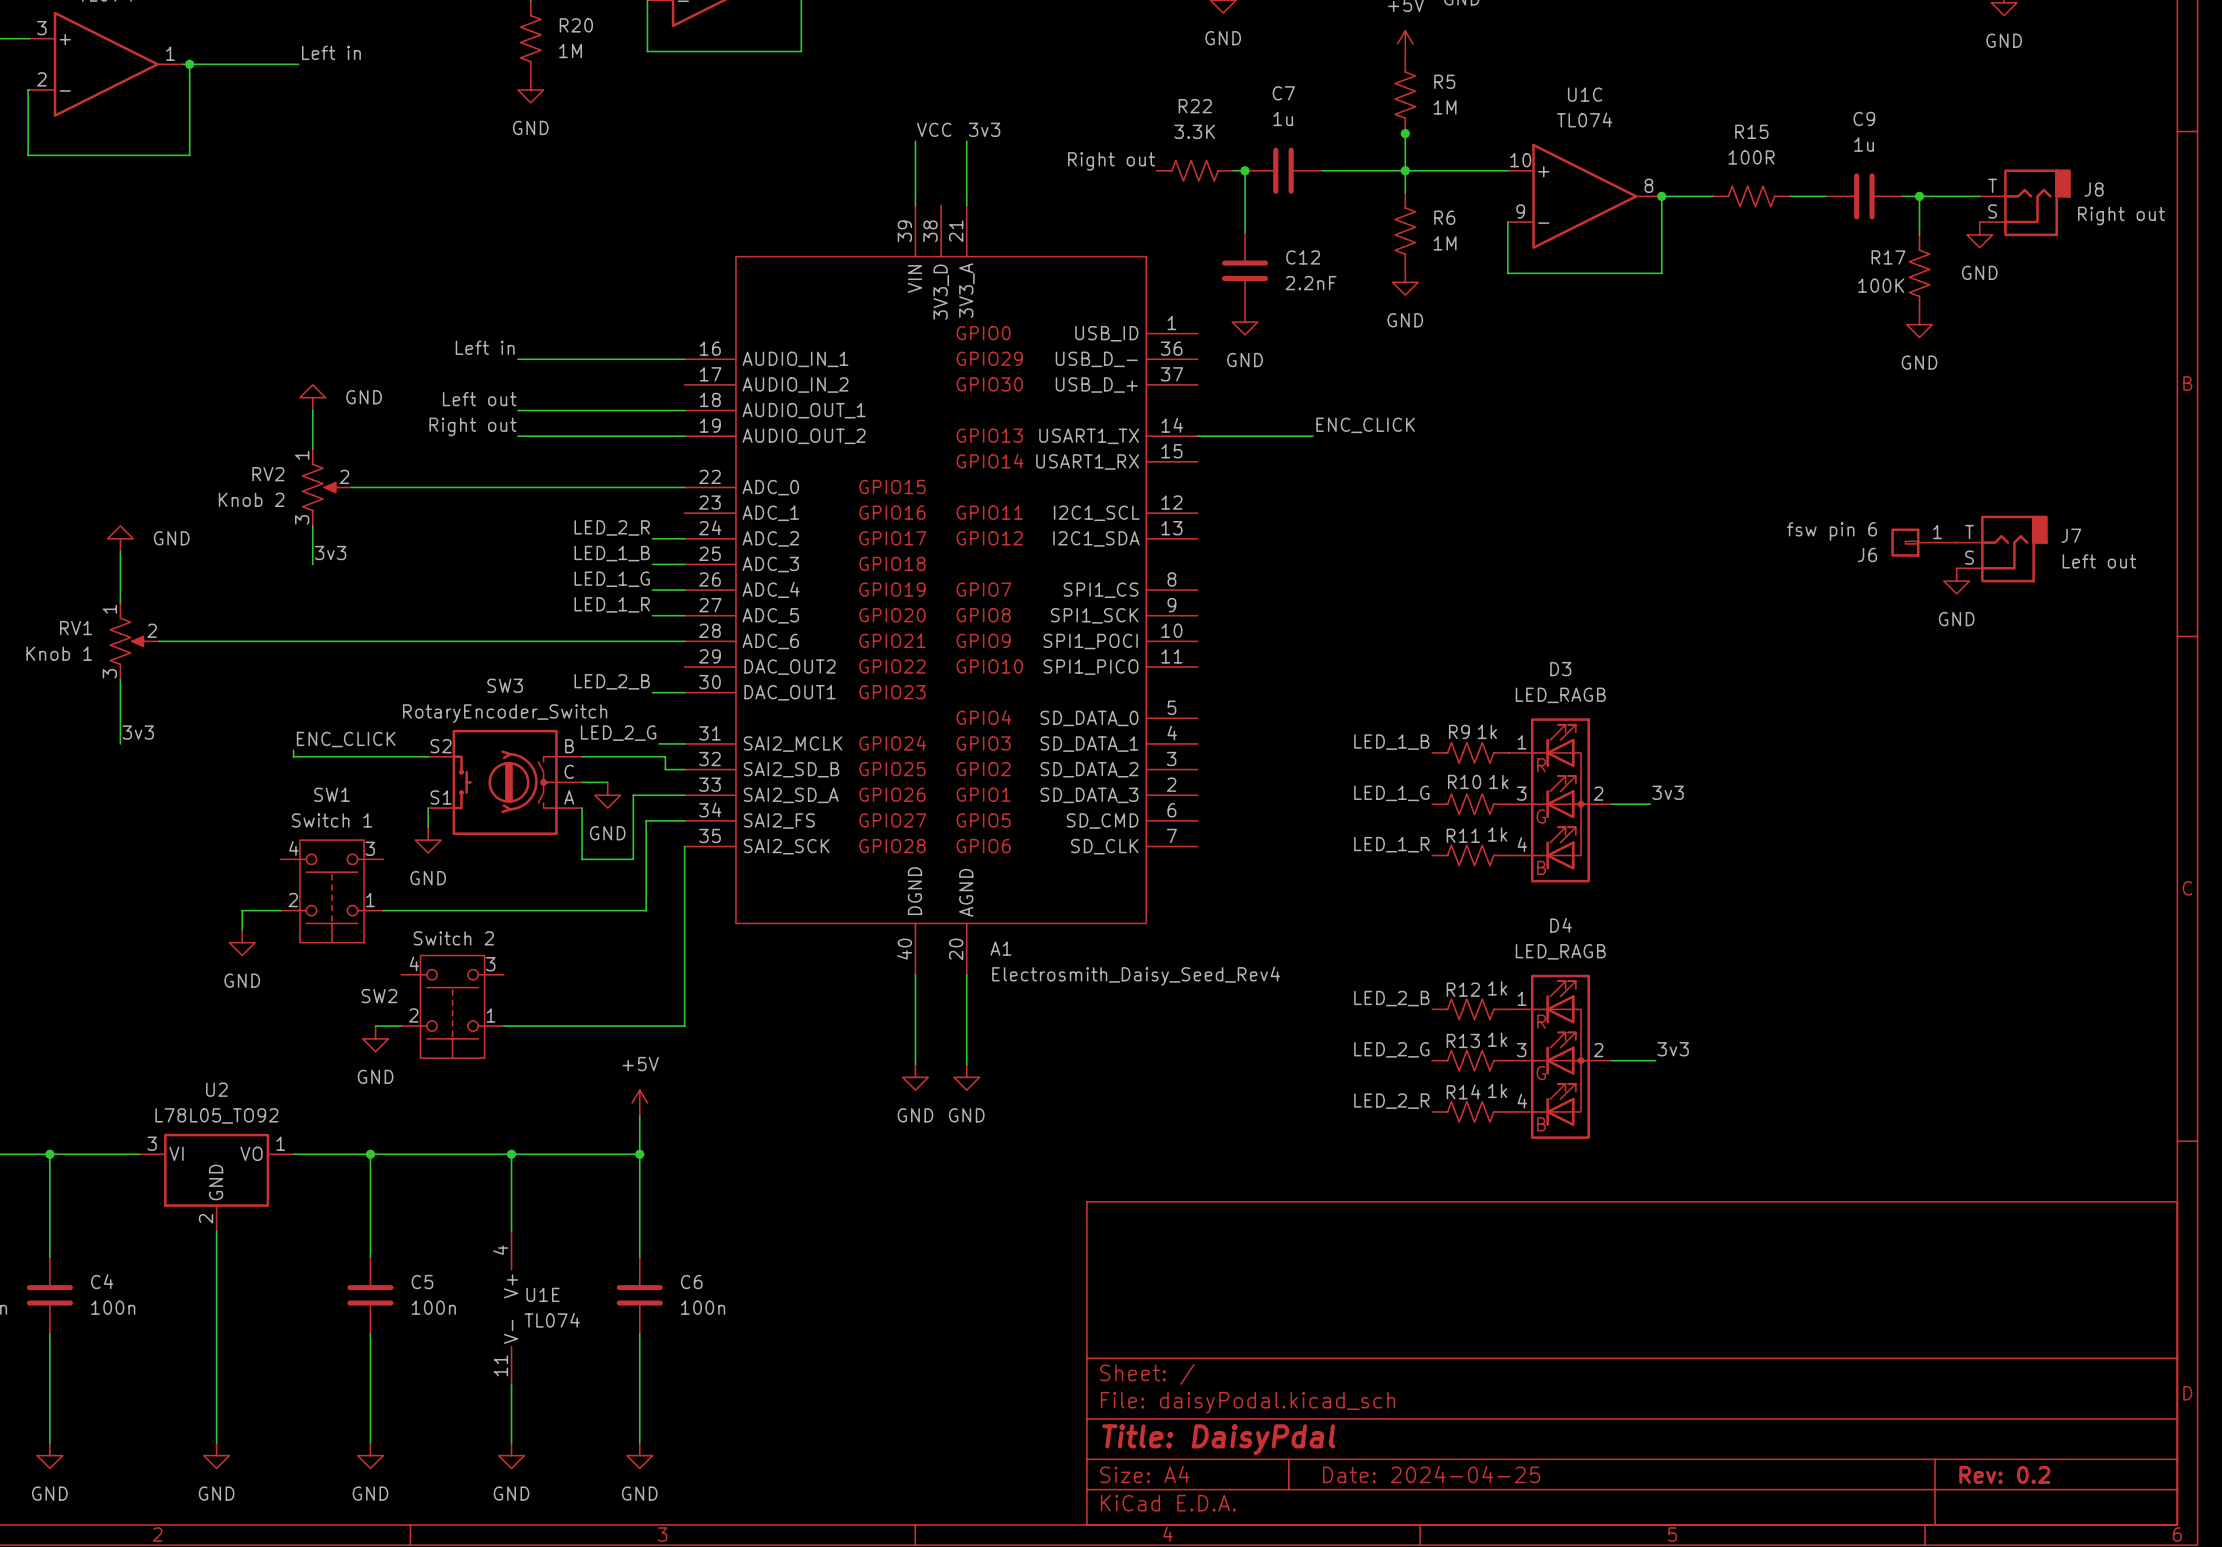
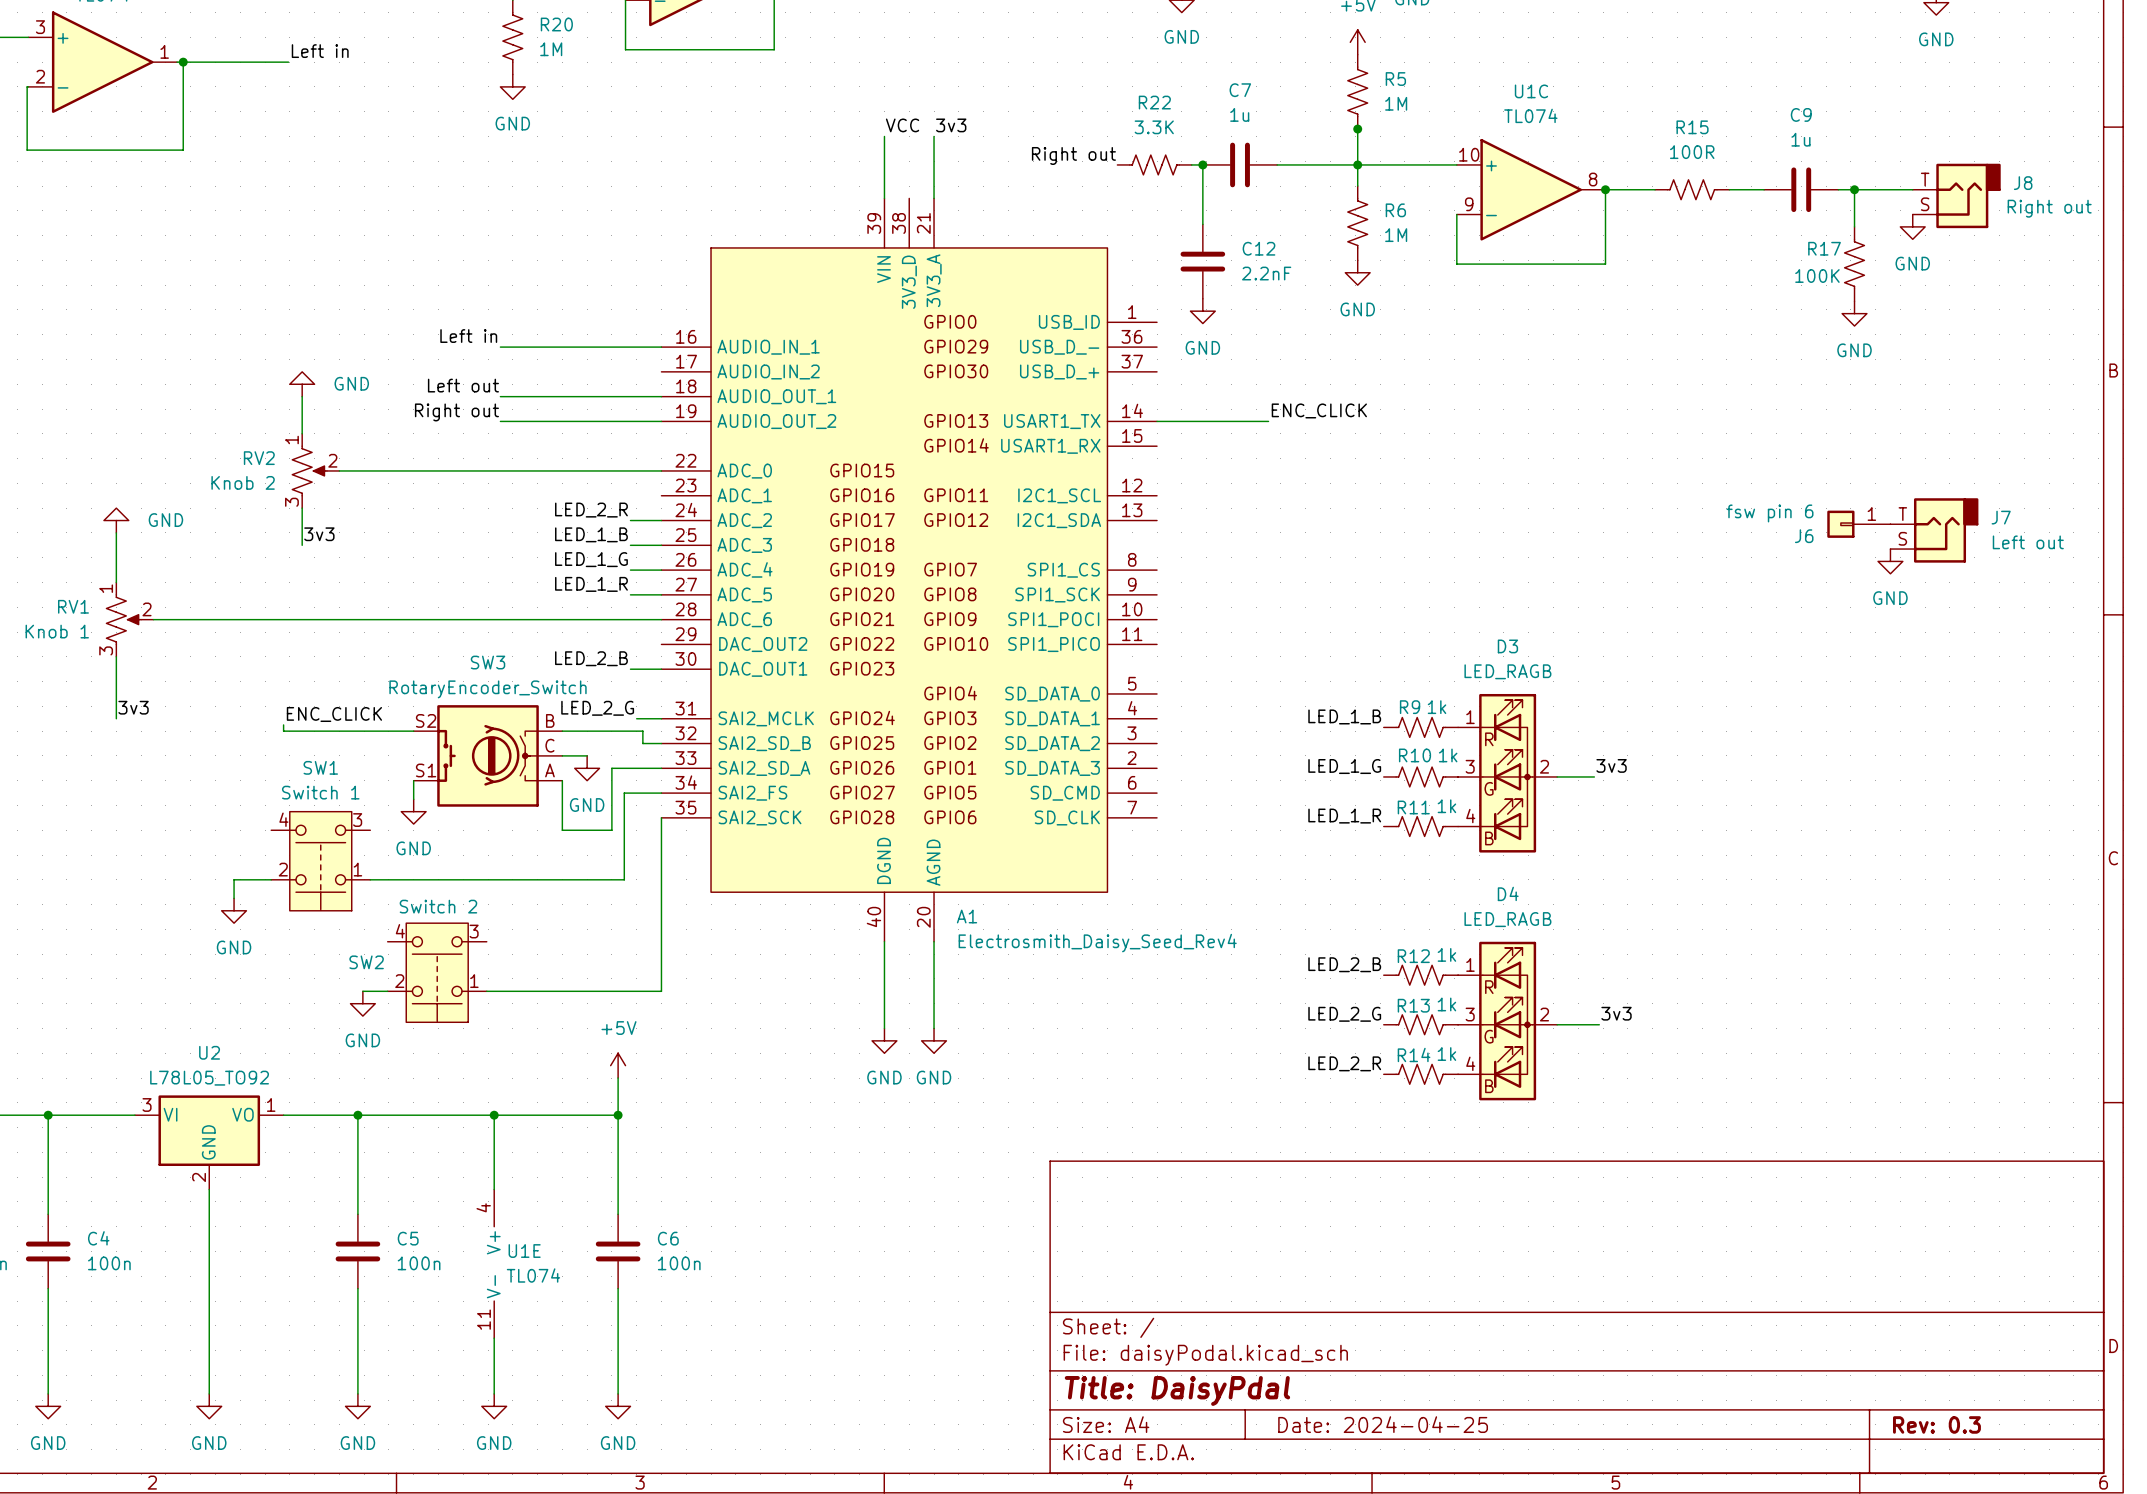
title block: Rev: 0.2 (2004, 1474) -> Rev: 0.3 (1936, 1424)

